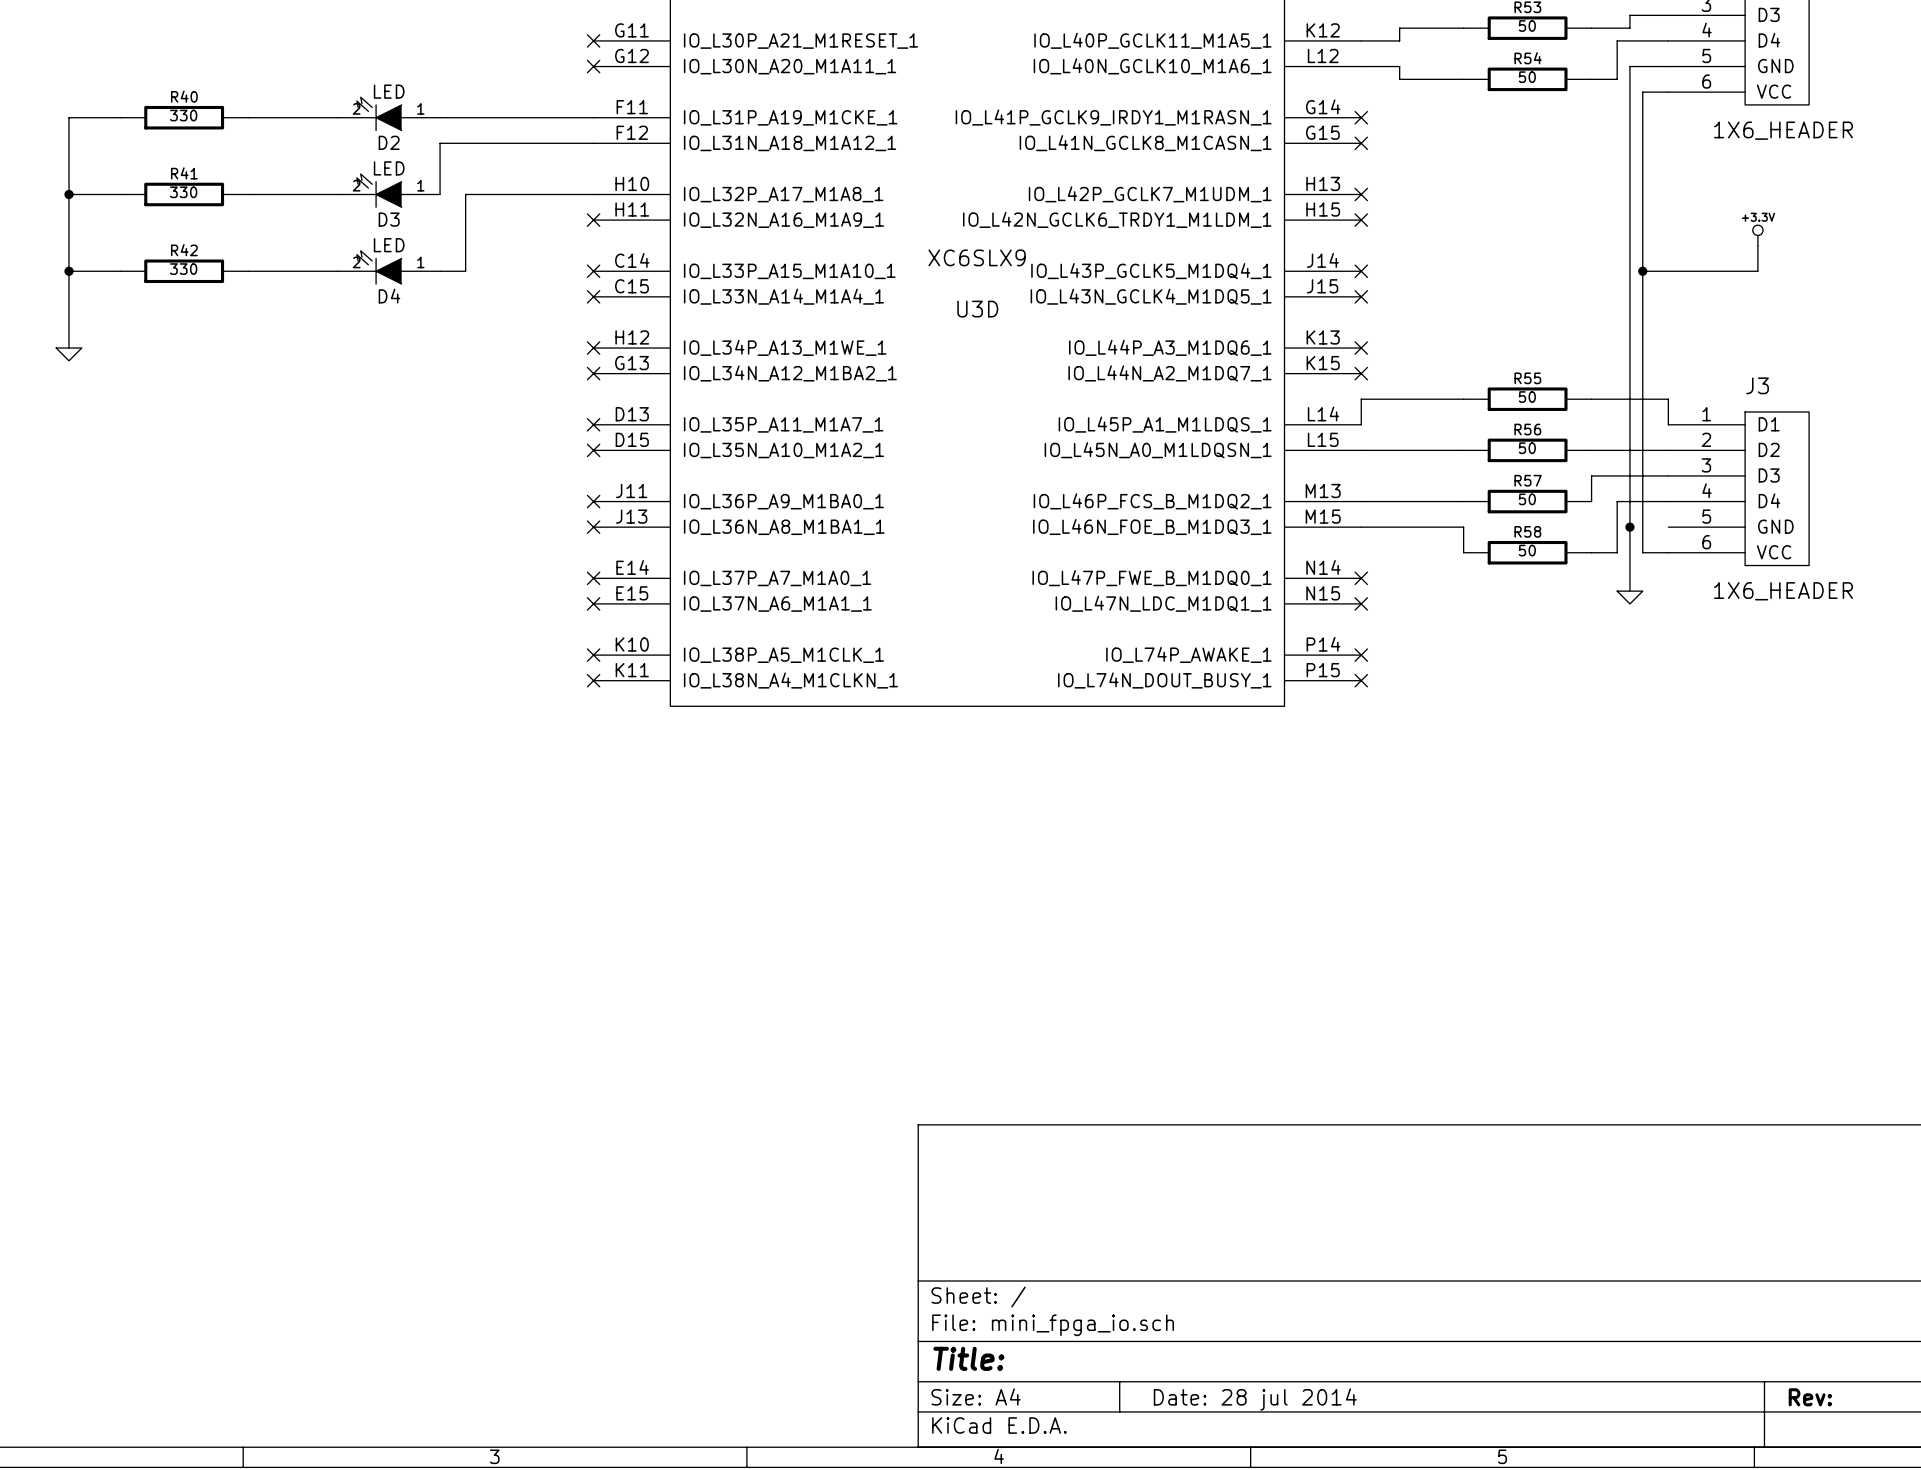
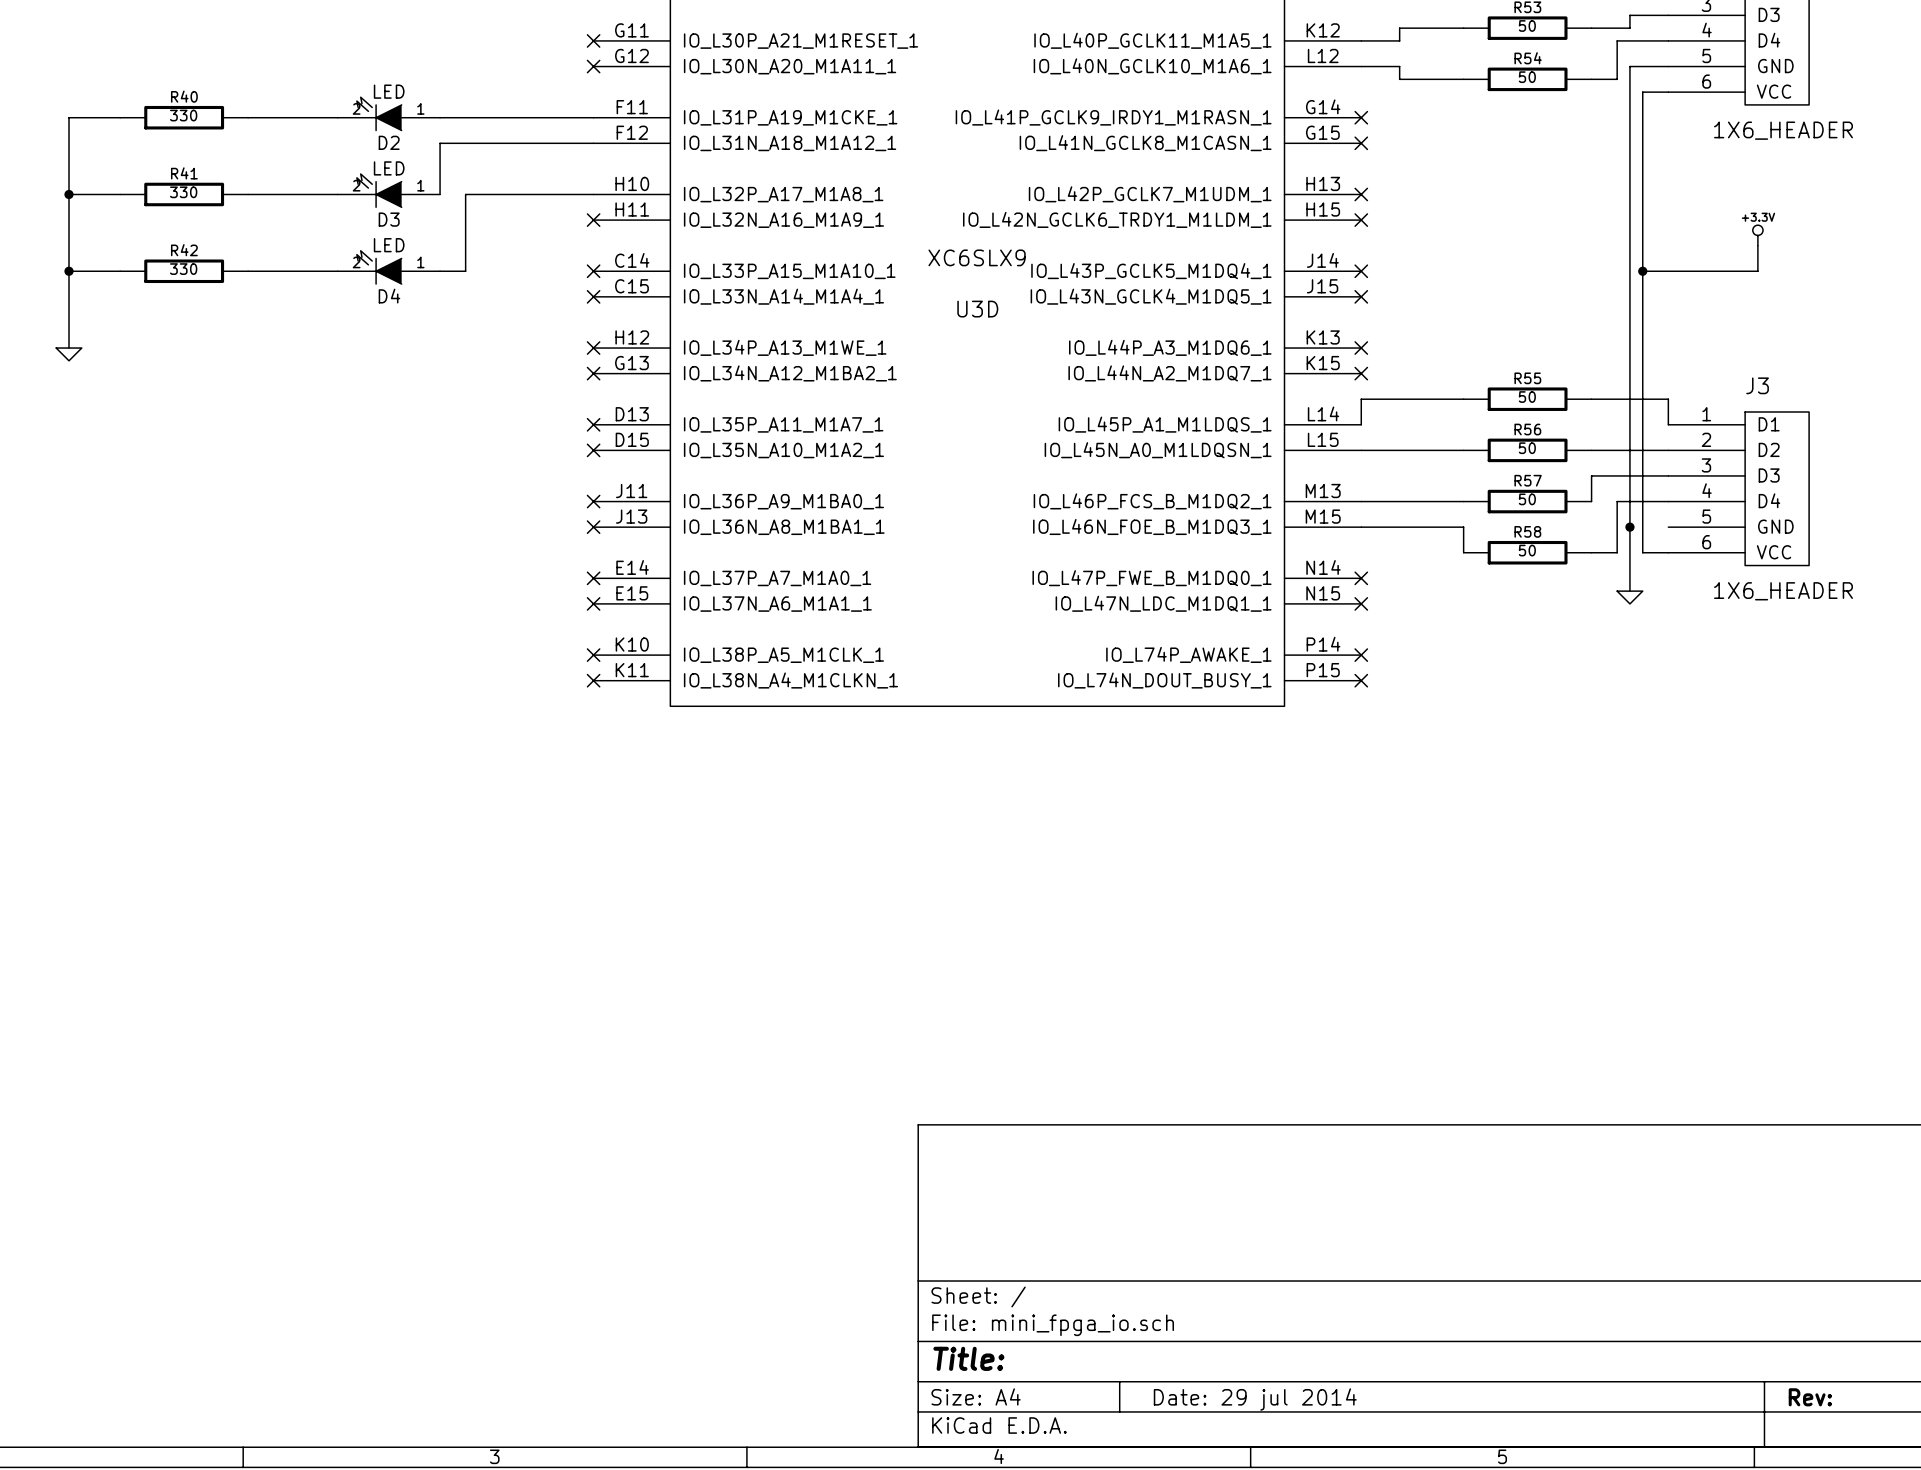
title block: Date: 28 jul 2014 (1255, 1399) -> Date: 29 jul 2014 (1255, 1399)

